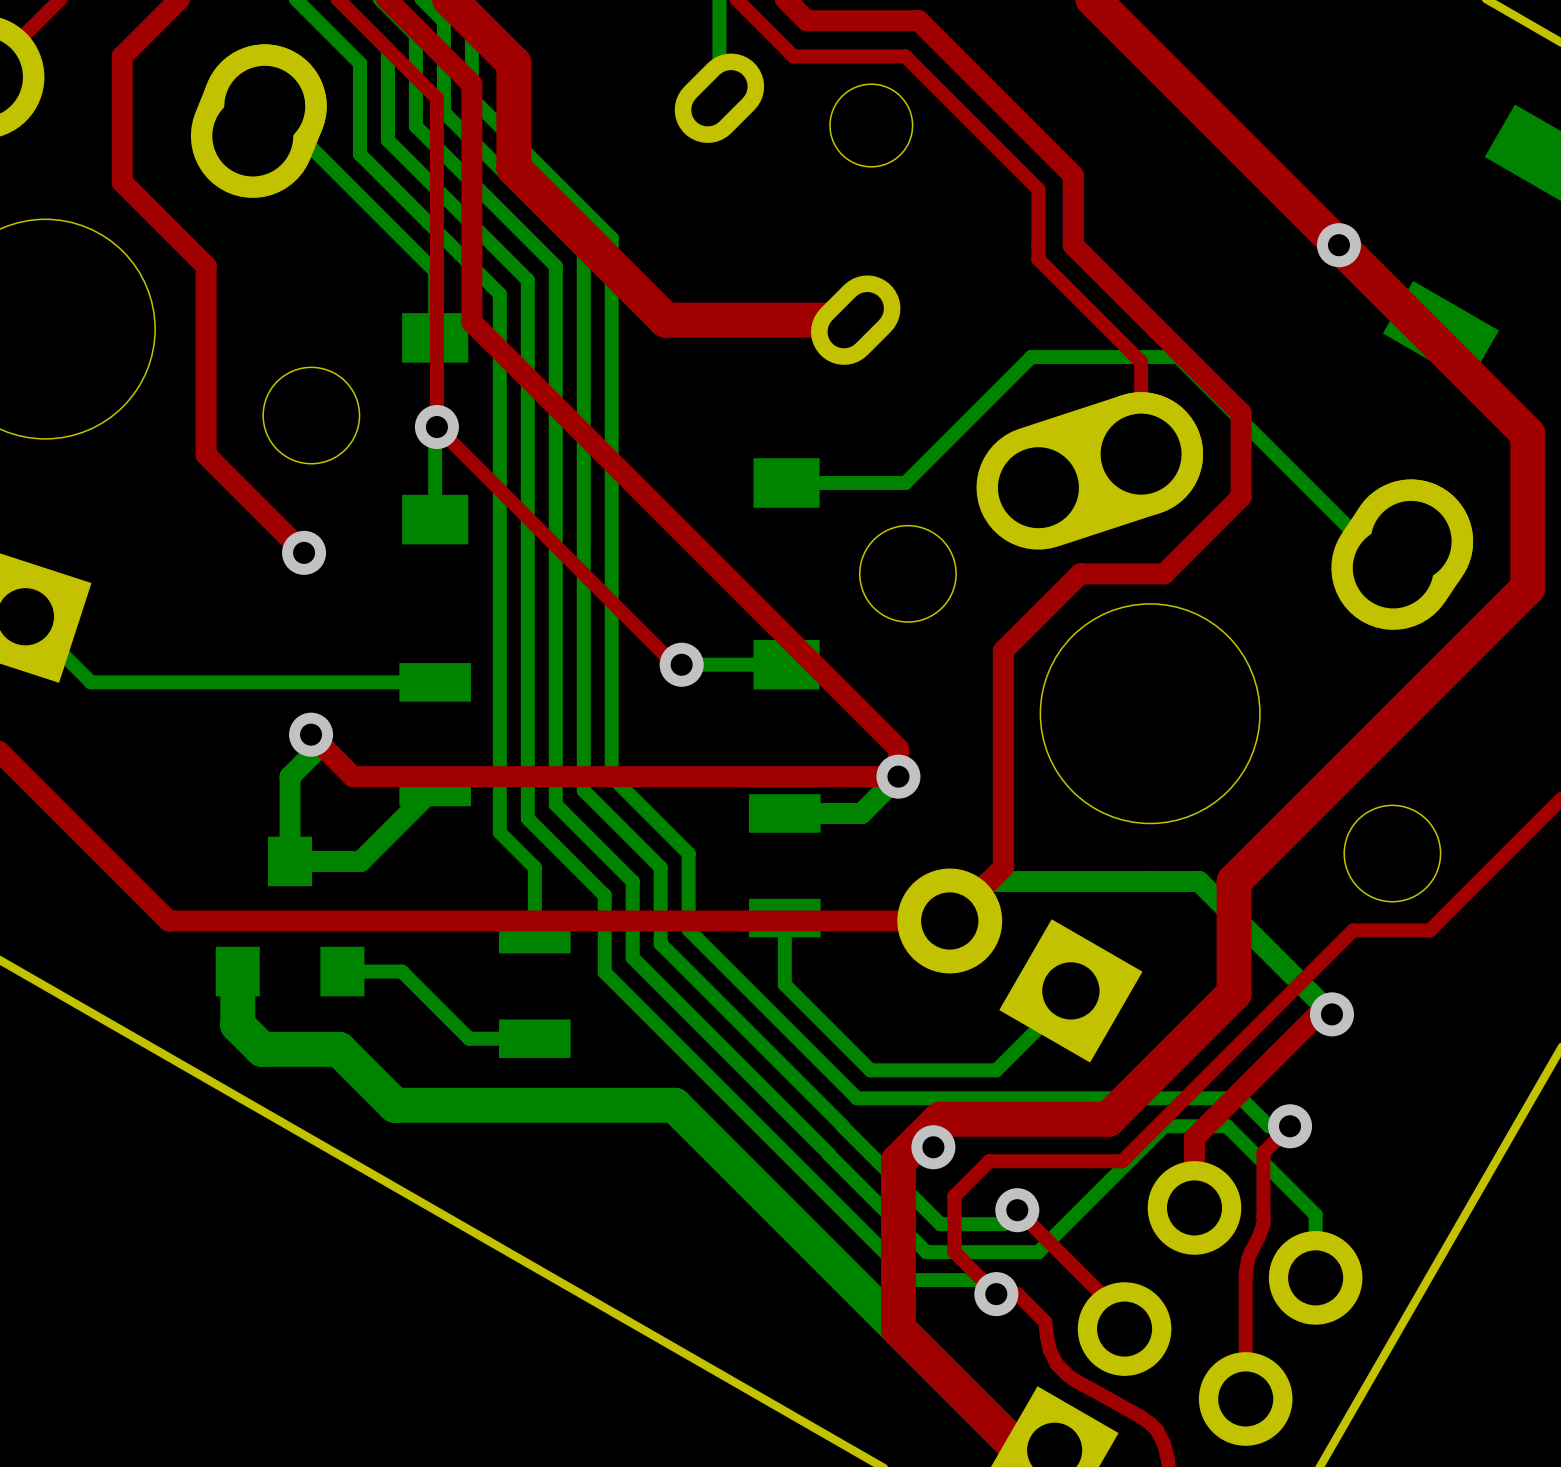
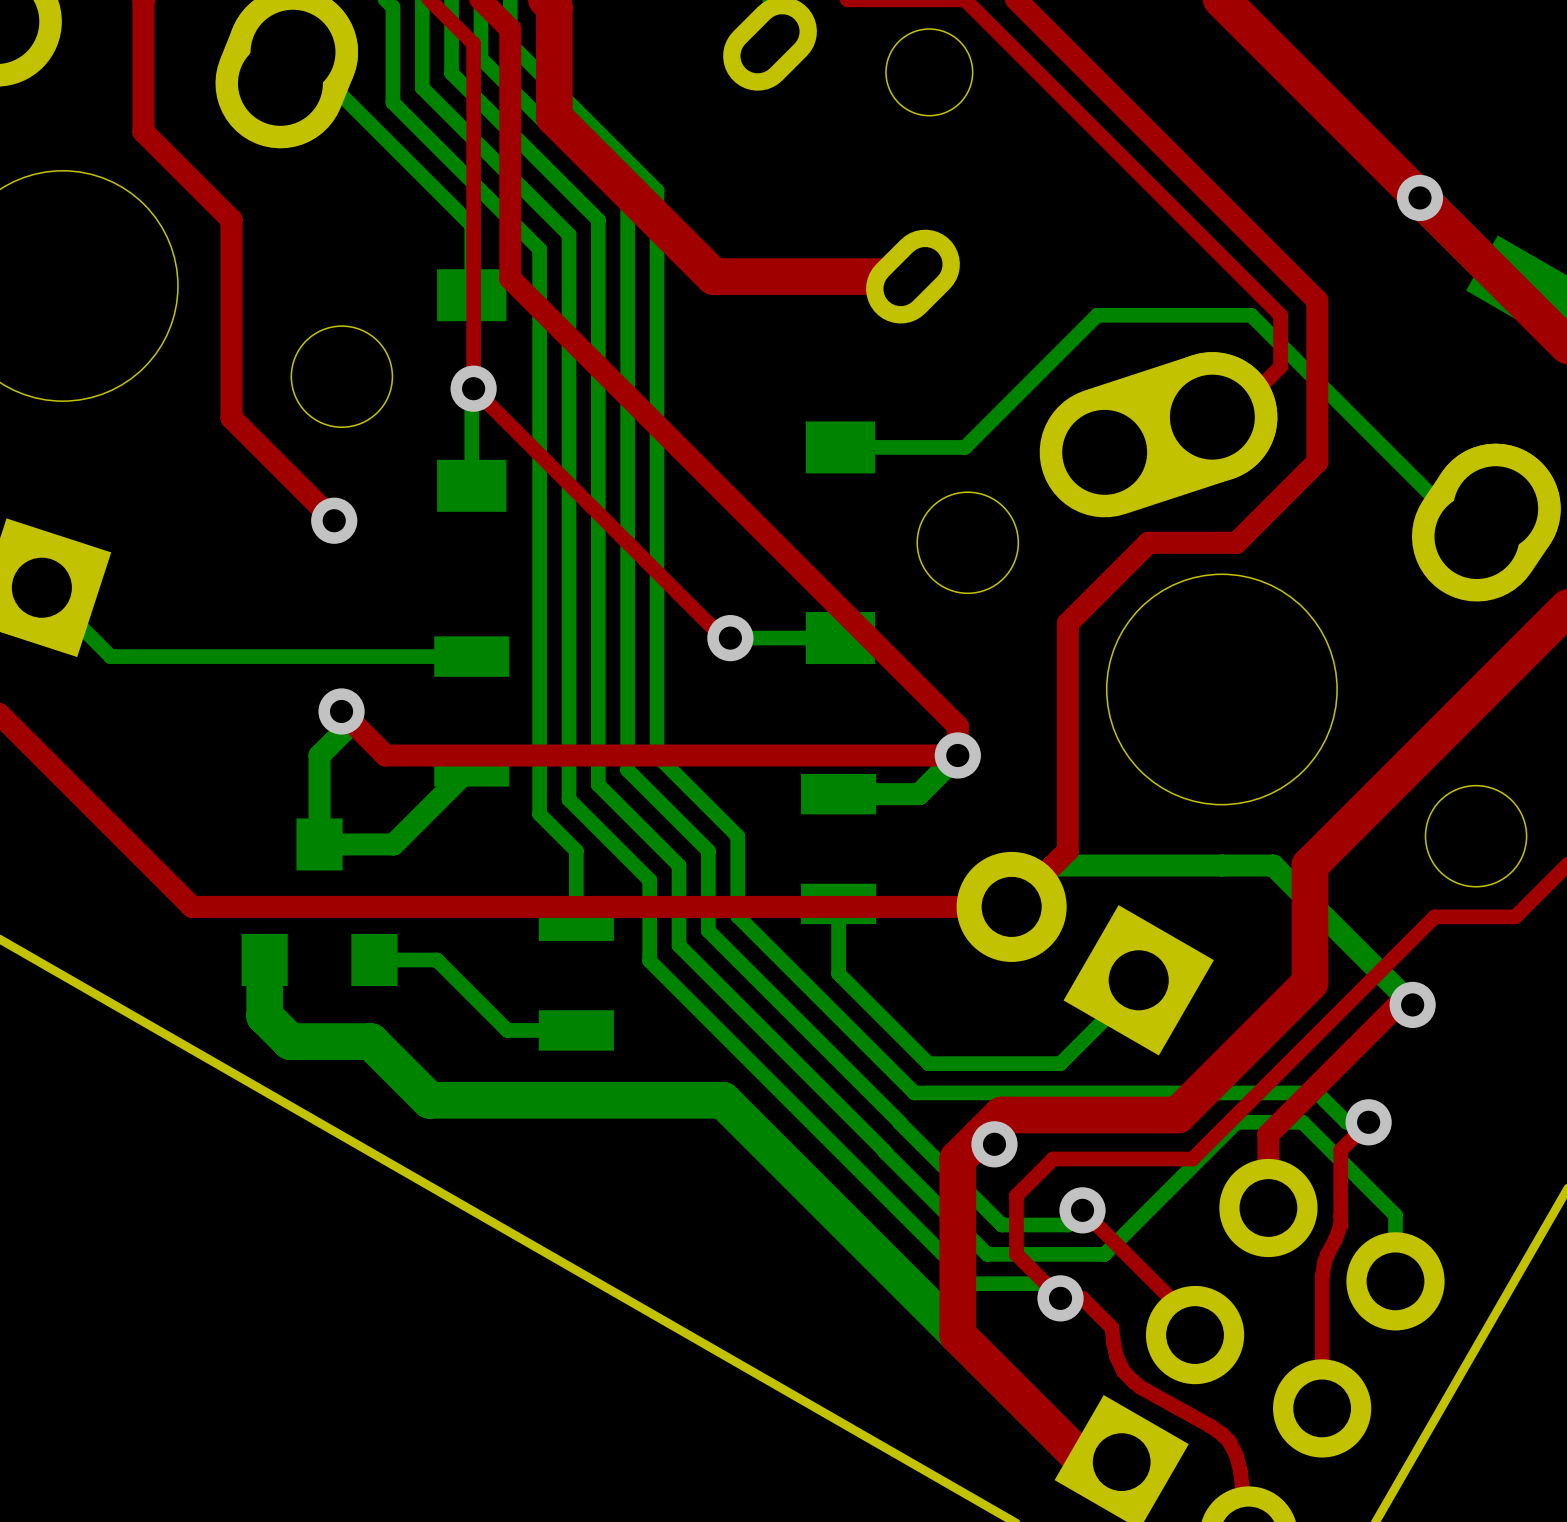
top track: (1073, 175) (1073, 245) (1241, 413) -> (1141, 124) (1317, 300) (1317, 374)
top track: (1038, 189) (1038, 259) (1141, 361) (1141, 454) -> (1104, 139) (1280, 315) (1280, 366) (1194, 452) (1104, 452)

